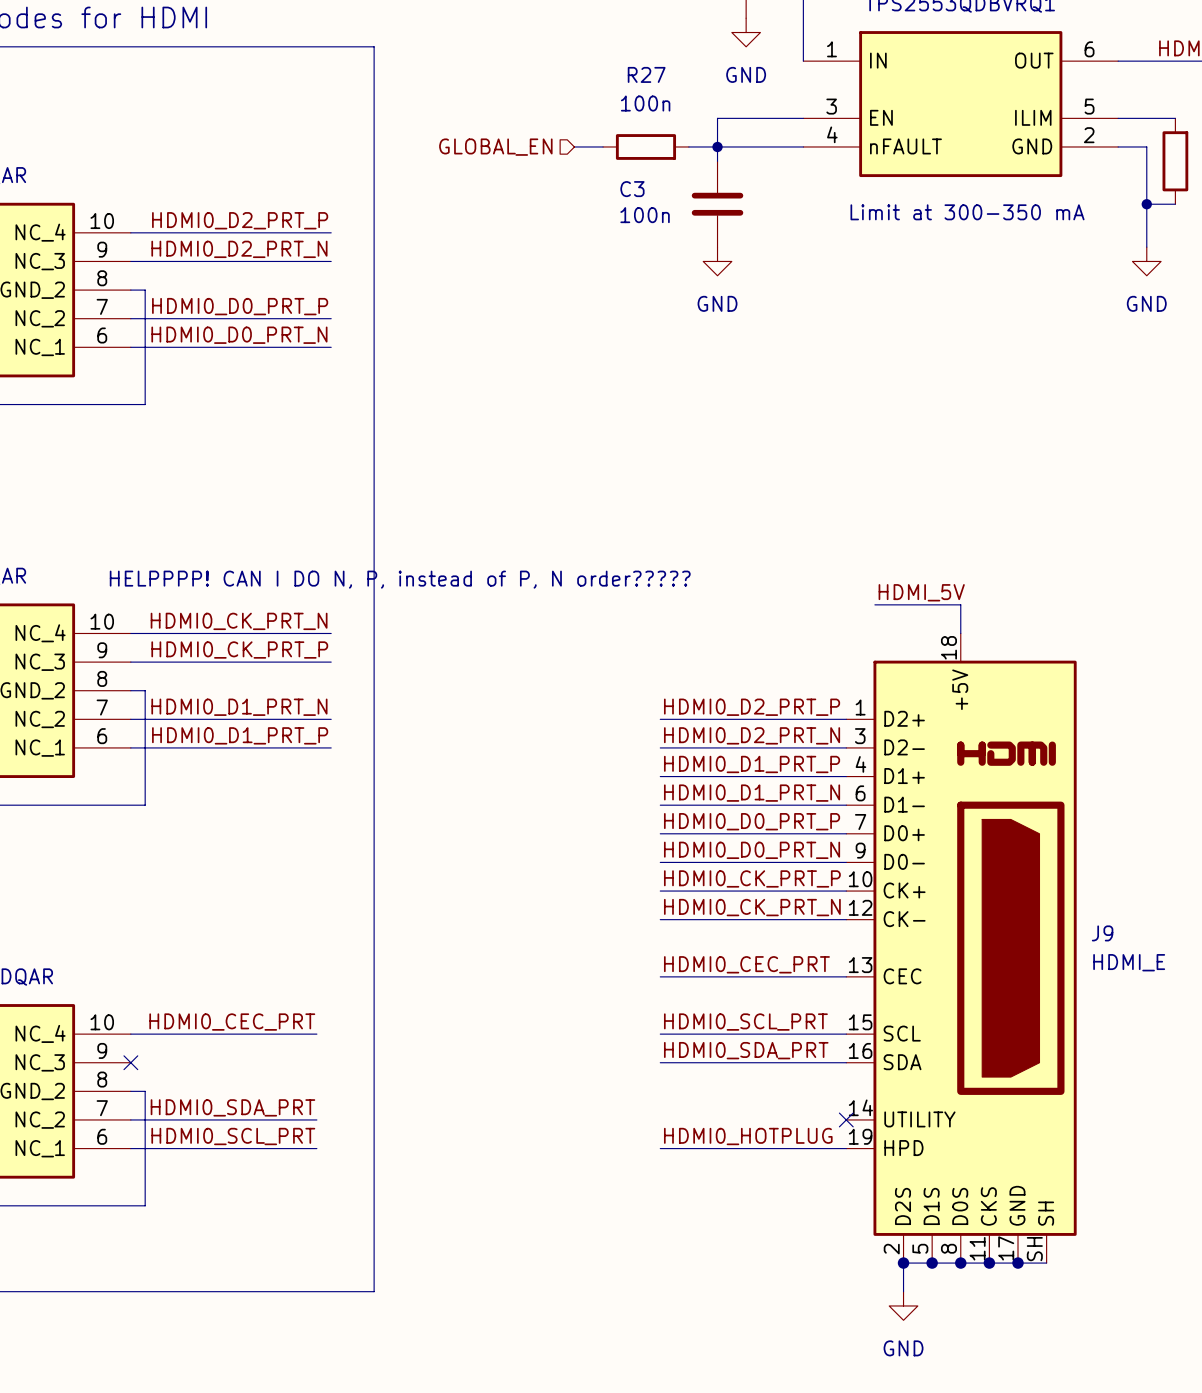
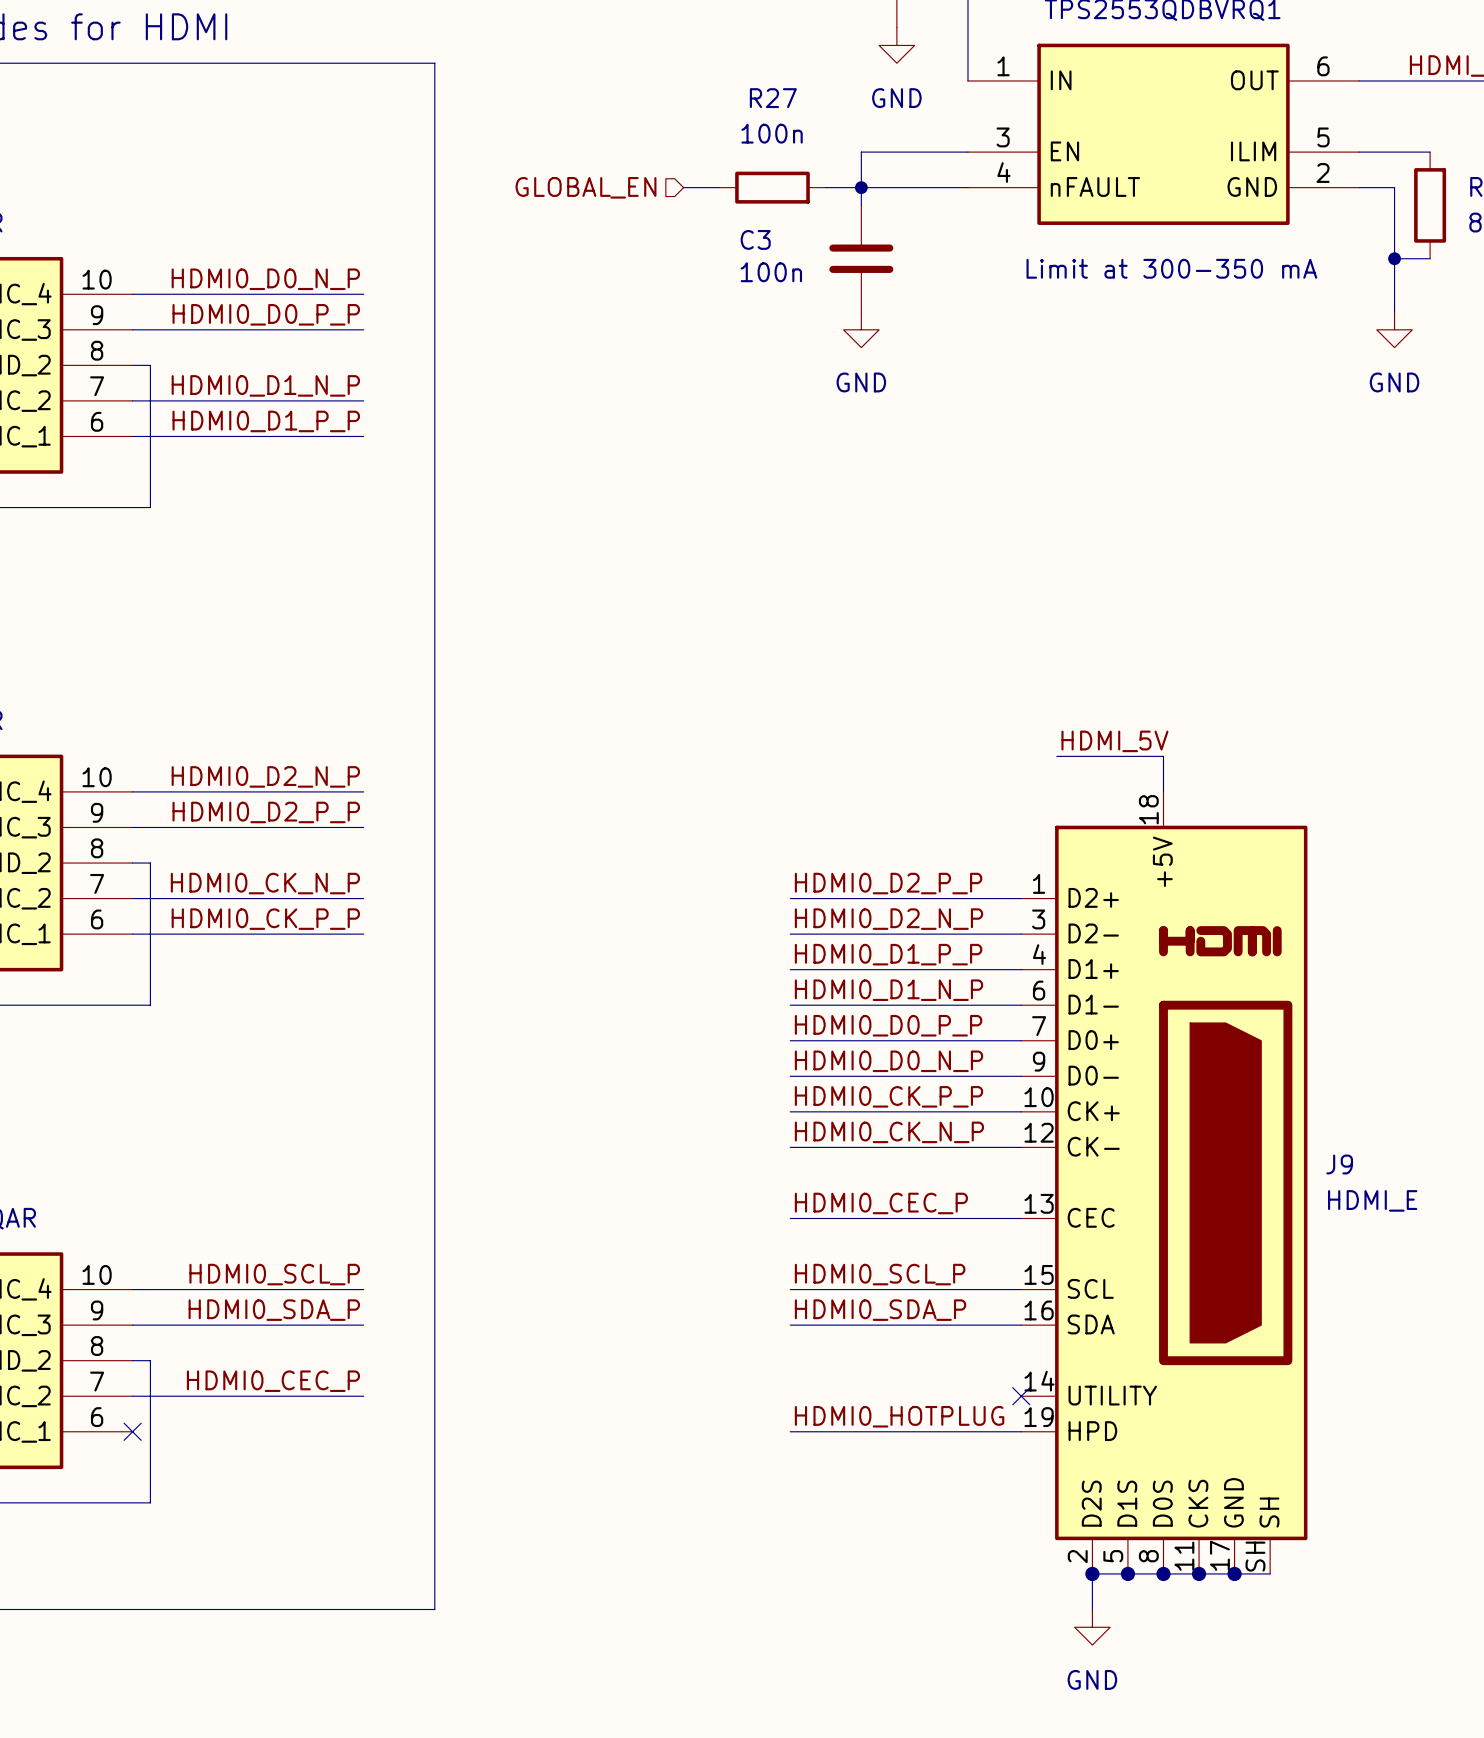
label: HDMI0_D2_PRT_P (240, 220) -> HDMI0_D0_N_P (265, 279)
wire: (316, 232) (331, 232) -> none
label: HDMI0_D2_PRT_N (239, 249) -> HDMI0_D0_P_P (266, 314)
wire: (316, 261) (331, 261) -> none
label: HDMI0_D0_PRT_P (240, 306) -> HDMI0_D1_N_P (265, 385)
wire: (316, 318) (331, 318) -> none
label: HDMI0_D0_PRT_N (239, 335) -> HDMI0_D1_P_P (266, 421)
wire: (316, 347) (331, 347) -> none
text: HELPPPP! CAN I DO N, P, instead of P, N order????? (400, 579) -> none
label: HDMI0_CK_PRT_N (239, 621) -> HDMI0_D2_N_P (265, 776)
wire: (316, 633) (331, 633) -> none
label: HDMI0_CK_PRT_P (239, 650) -> HDMI0_D2_P_P (266, 812)
wire: (316, 662) (331, 662) -> none
label: HDMI0_D1_PRT_N (239, 707) -> HDMI0_CK_N_P (265, 883)
label: HDMI0_D2_PRT_P (752, 707) -> HDMI0_D2_P_P (888, 883)
wire: (316, 719) (331, 719) -> none
label: HDMI0_D1_PRT_P (240, 735) -> HDMI0_CK_P_P (265, 919)
label: HDMI0_D2_PRT_N (752, 735) -> HDMI0_D2_N_P (888, 919)
wire: (316, 747) (331, 747) -> none
label: HDMI0_D1_PRT_P (752, 764) -> HDMI0_D1_P_P (888, 954)
label: HDMI0_D1_PRT_N (752, 793) -> HDMI0_D1_N_P (888, 990)
label: HDMI0_D0_PRT_P (752, 821) -> HDMI0_D0_P_P (888, 1025)
label: HDMI0_D0_PRT_N (752, 850) -> HDMI0_D0_N_P (888, 1061)
label: HDMI0_CK_PRT_P (752, 878) -> HDMI0_CK_P_P (888, 1096)
label: HDMI0_CK_PRT_N (752, 907) -> HDMI0_CK_N_P (889, 1132)
label: HDMI0_CEC_PRT (746, 964) -> HDMI0_CEC_P (881, 1203)
label: HDMI0_CEC_PRT (232, 1022) -> HDMI0_SCL_P (274, 1274)
label: HDMI0_SCL_PRT (745, 1022) -> HDMI0_SCL_P (880, 1274)
label: none -> HDMI0_SDA_P (274, 1310)
label: HDMI0_SDA_PRT (746, 1050) -> HDMI0_SDA_P (880, 1310)
no-connect mark: (130, 1062) -> none
label: HDMI0_SDA_PRT (232, 1107) -> HDMI0_CEC_P (273, 1381)
label: HDMI0_SCL_PRT (233, 1136) -> none
wire: (130, 1148) (316, 1148) -> (132, 1325) (363, 1325)
no-connect mark: none -> (132, 1431)

